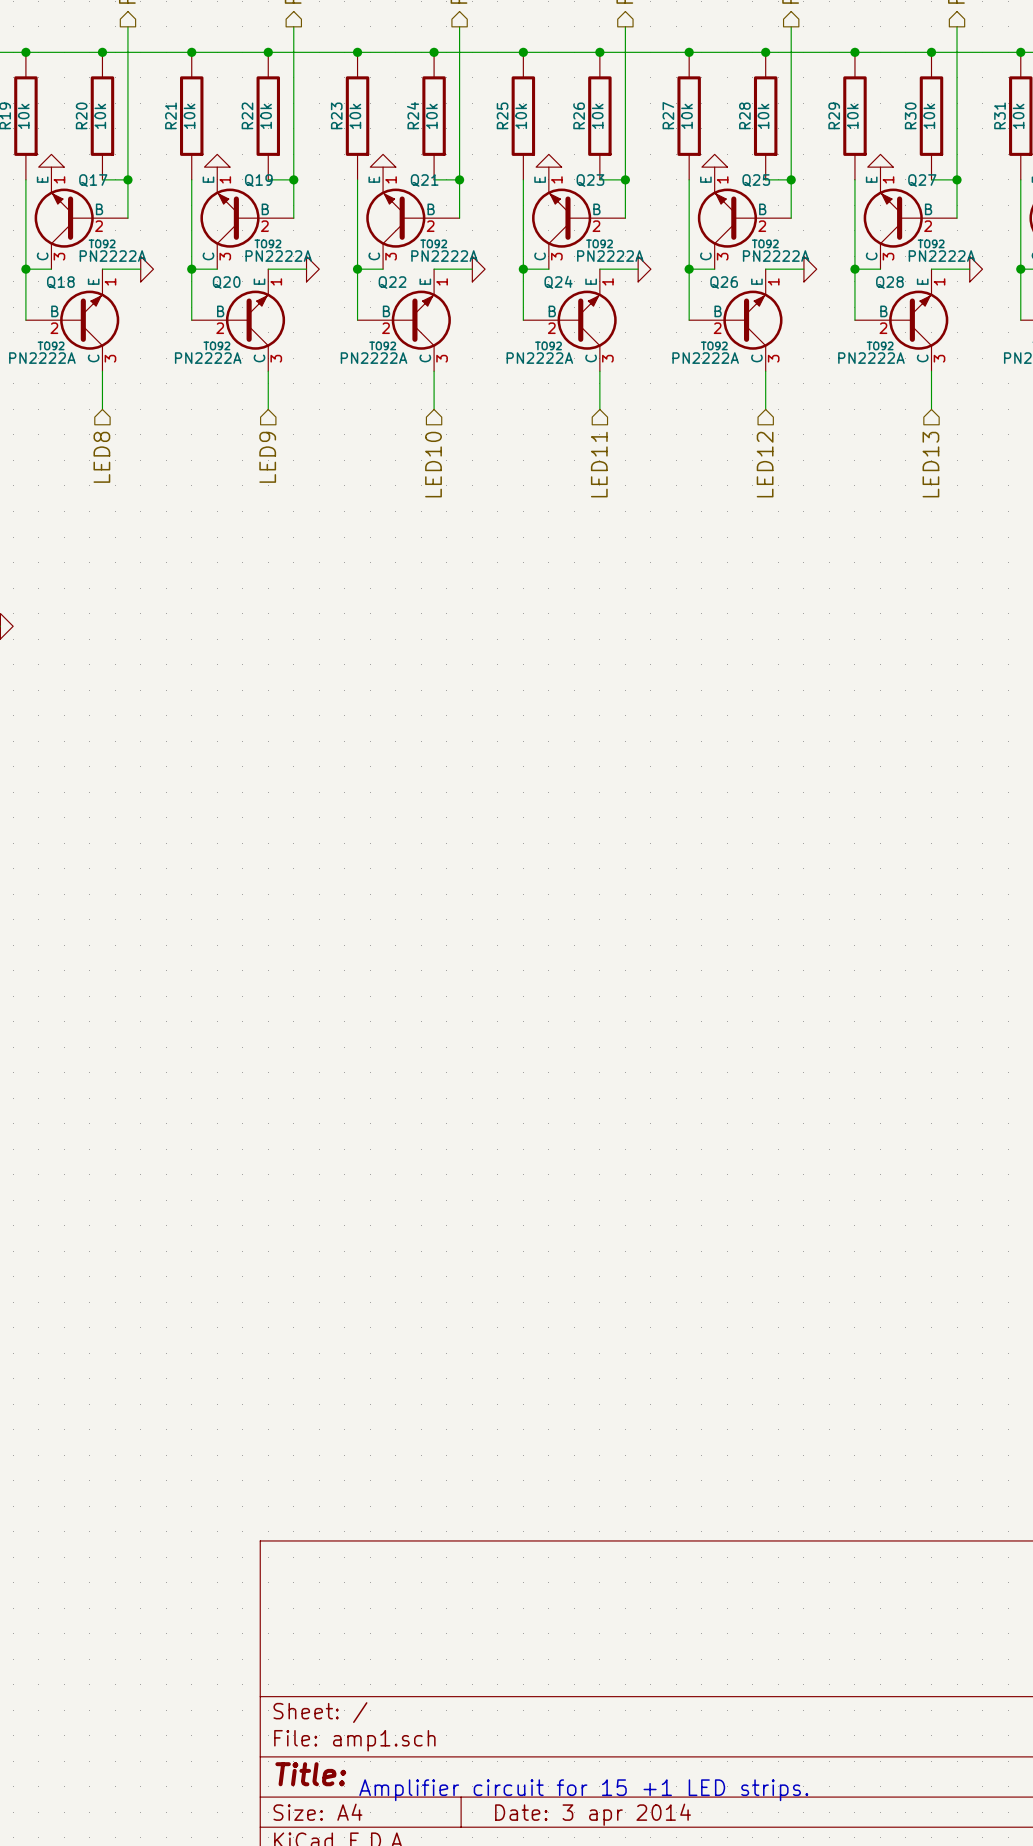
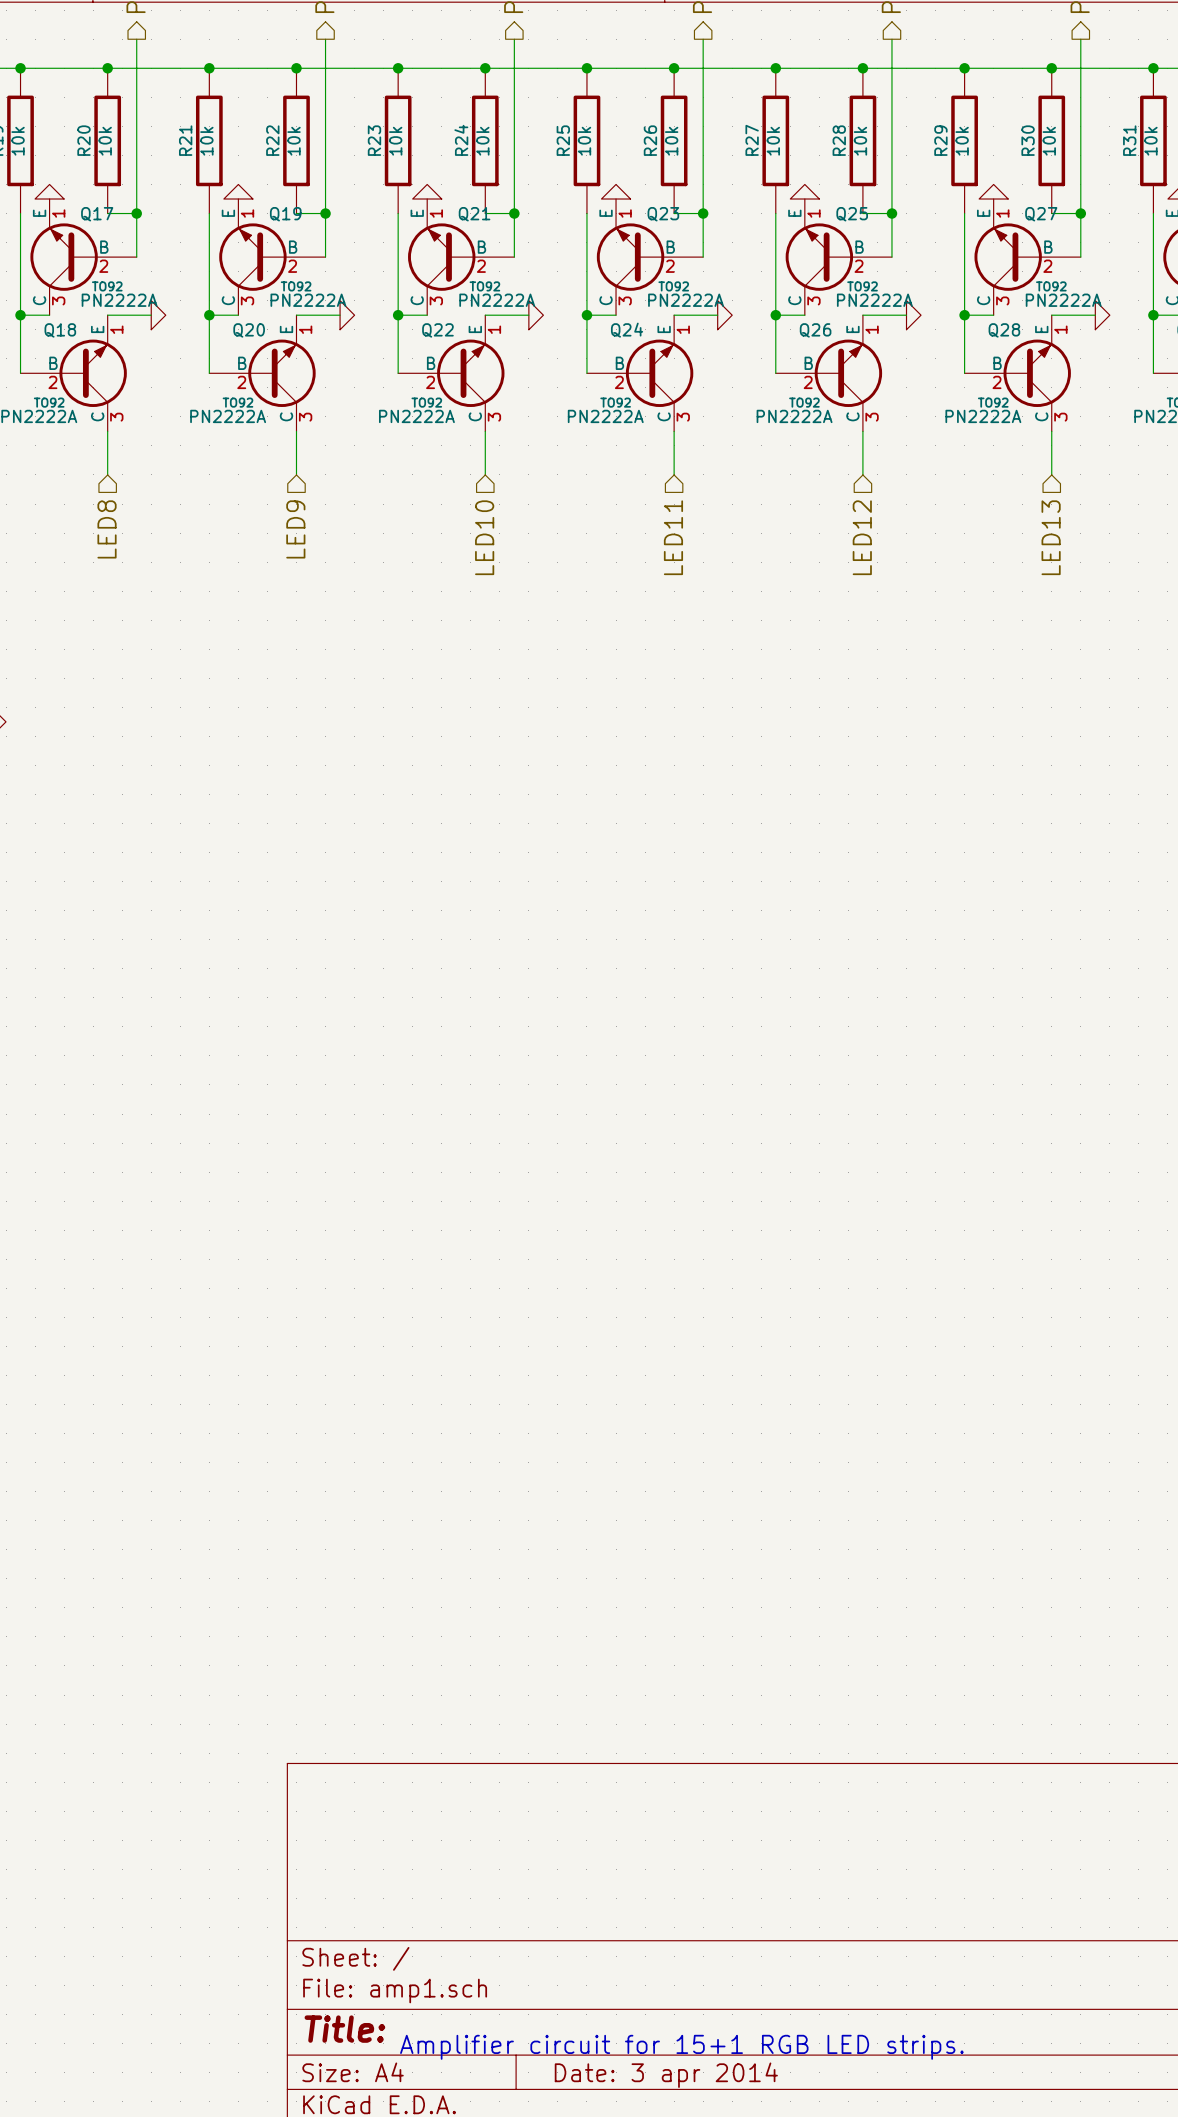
text: Amplifier circuit for 15 +1 LED strips. (583, 1790) -> Amplifier circuit for 15+1 RGB LED strips. (681, 2047)

